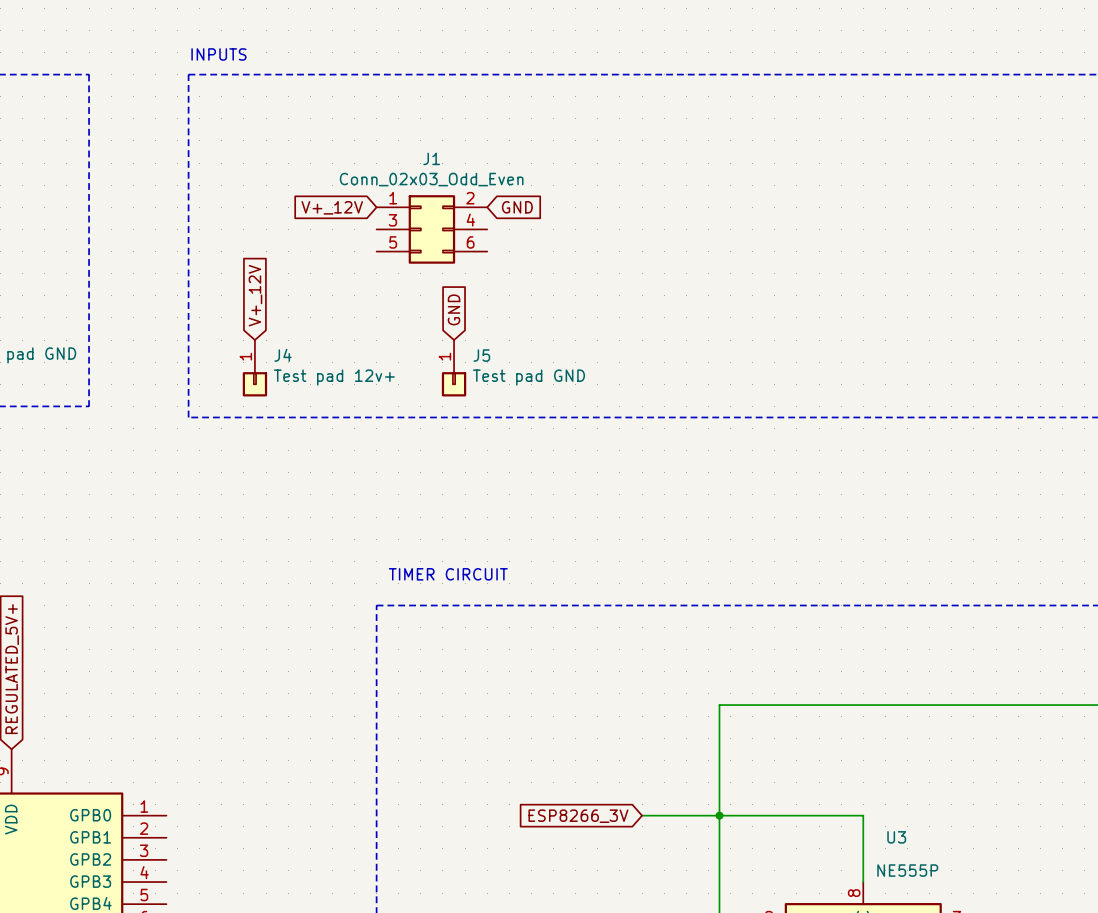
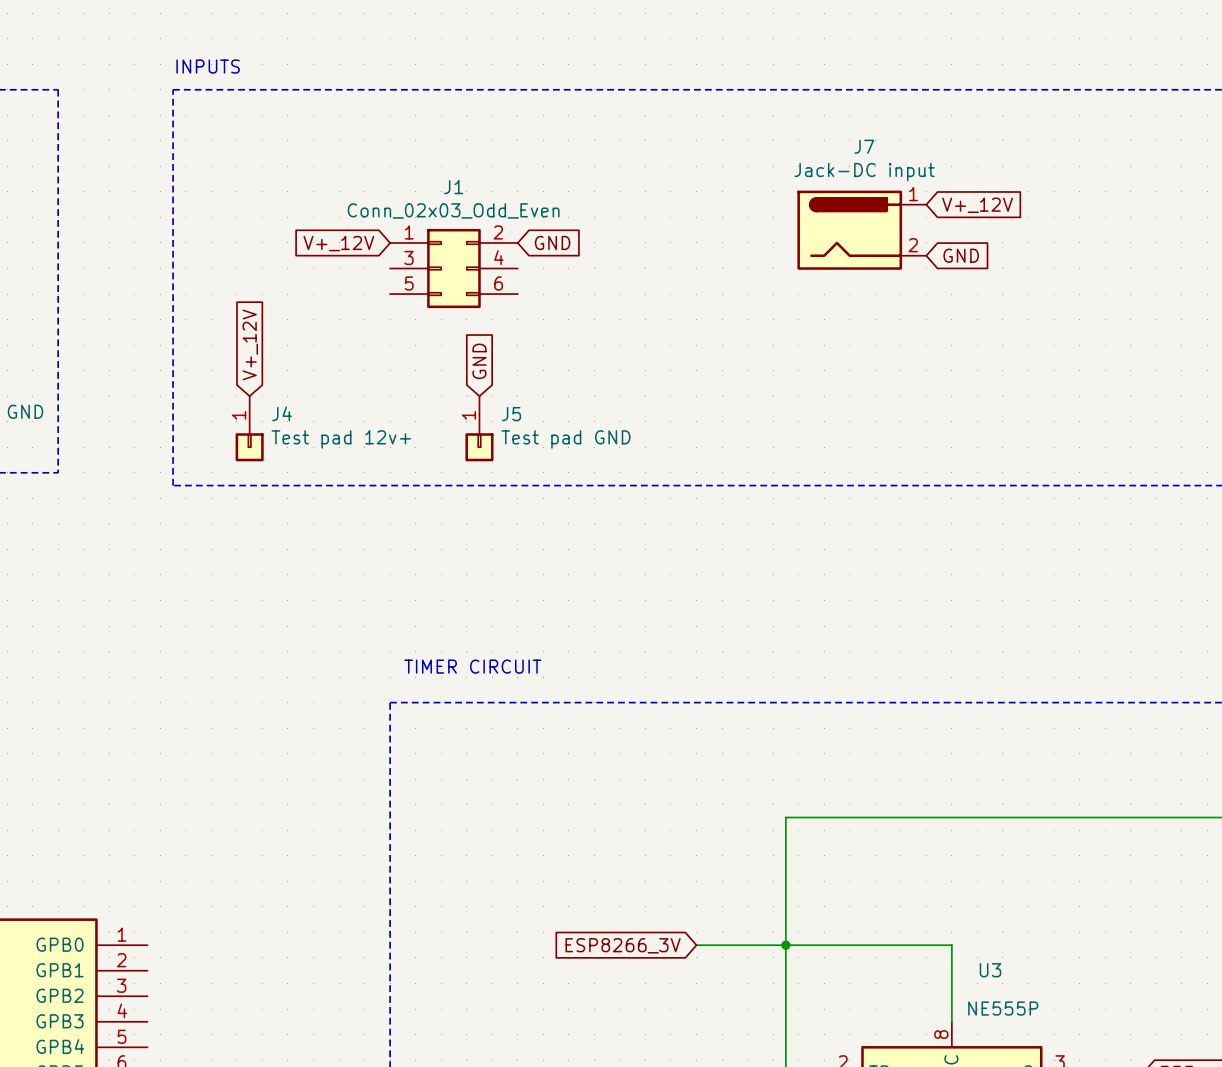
global label: none -> V+_12V (977, 205)
J7: none -> Jack-DC input (861, 230)
global label: none -> GND (961, 255)

